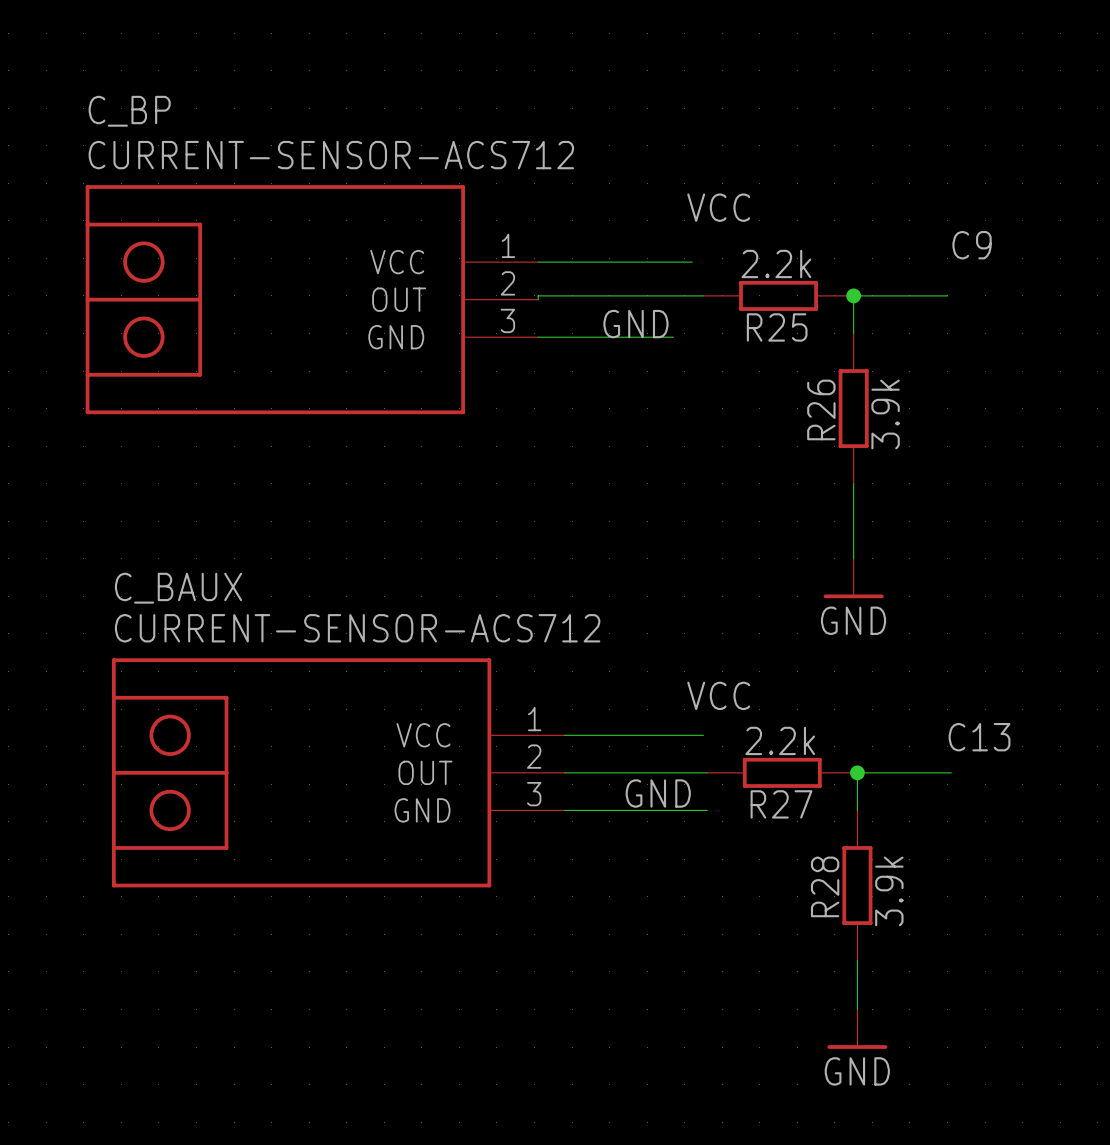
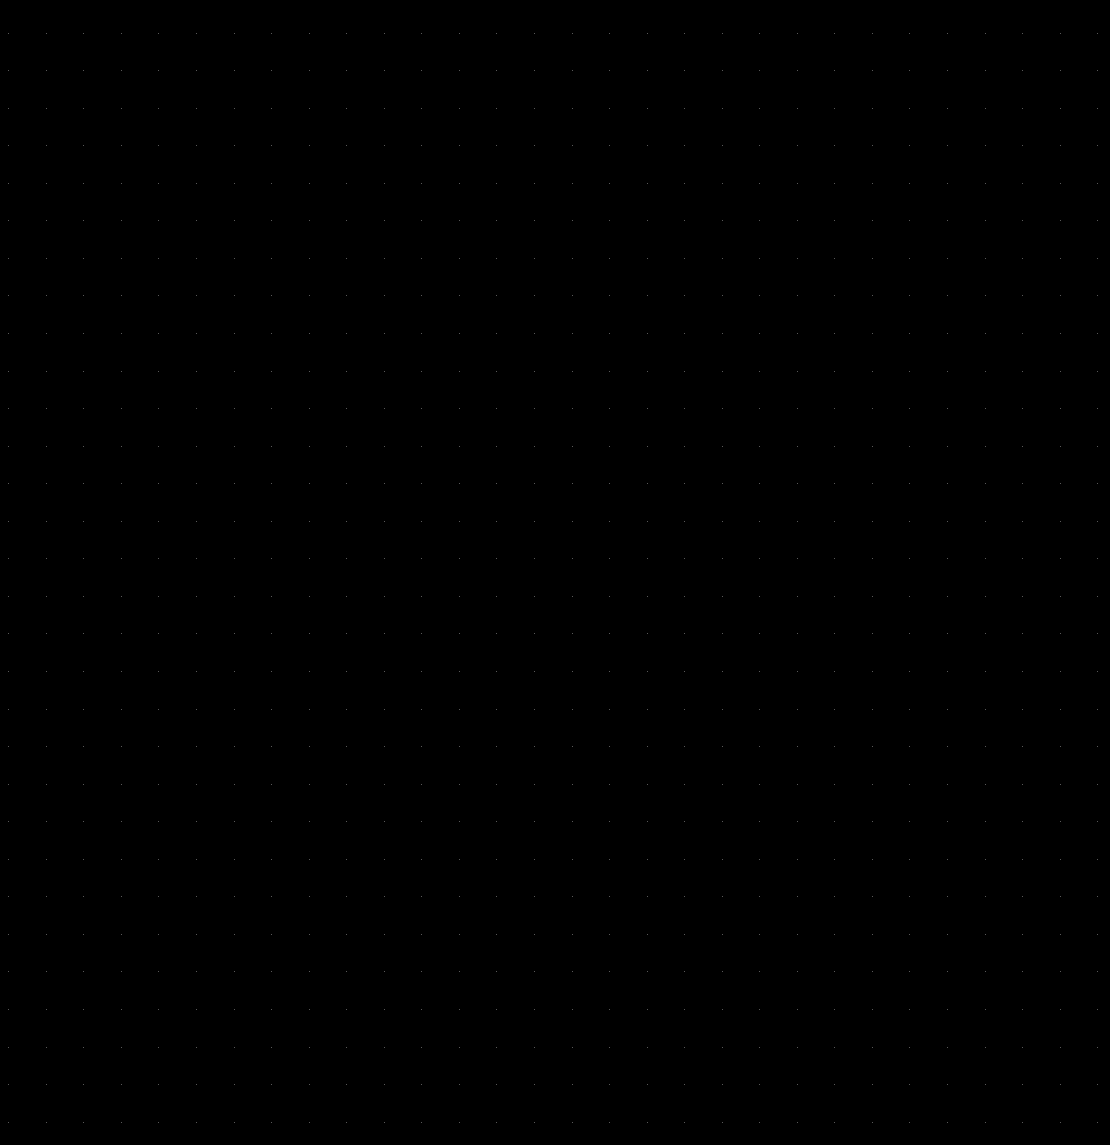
label: VCC (718, 207) -> none
label: C9 (972, 245) -> none
wire: (538, 262) (692, 262) -> none
wire: (703, 295) (538, 295) (538, 299) -> none
R25: 2.2k (778, 295) -> none
junction: (853, 295) -> none
wire: (947, 295) (853, 295) (853, 333) -> none
C_BP: CURRENT-SENSOR-ACS712 (311, 299) -> none
label: GND (635, 324) -> none
wire: (538, 337) (673, 337) -> none
R26: 3.9k (853, 408) -> none
wire: (853, 483) (853, 558) -> none
power symbol: GND (853, 578) -> none
label: VCC (718, 695) -> none
wire: (564, 735) (703, 735) -> none
label: C13 (979, 737) -> none
C_BAUX: CURRENT-SENSOR-ACS712 (338, 772) -> none
wire: (564, 772) (707, 772) -> none
R27: 2.2k (782, 772) -> none
junction: (857, 772) -> none
wire: (951, 772) (857, 772) (857, 810) -> none
label: GND (658, 793) -> none
wire: (564, 810) (707, 810) -> none
R28: 3.9k (857, 885) -> none
wire: (857, 960) (857, 1009) -> none
power symbol: GND (857, 1029) -> none

